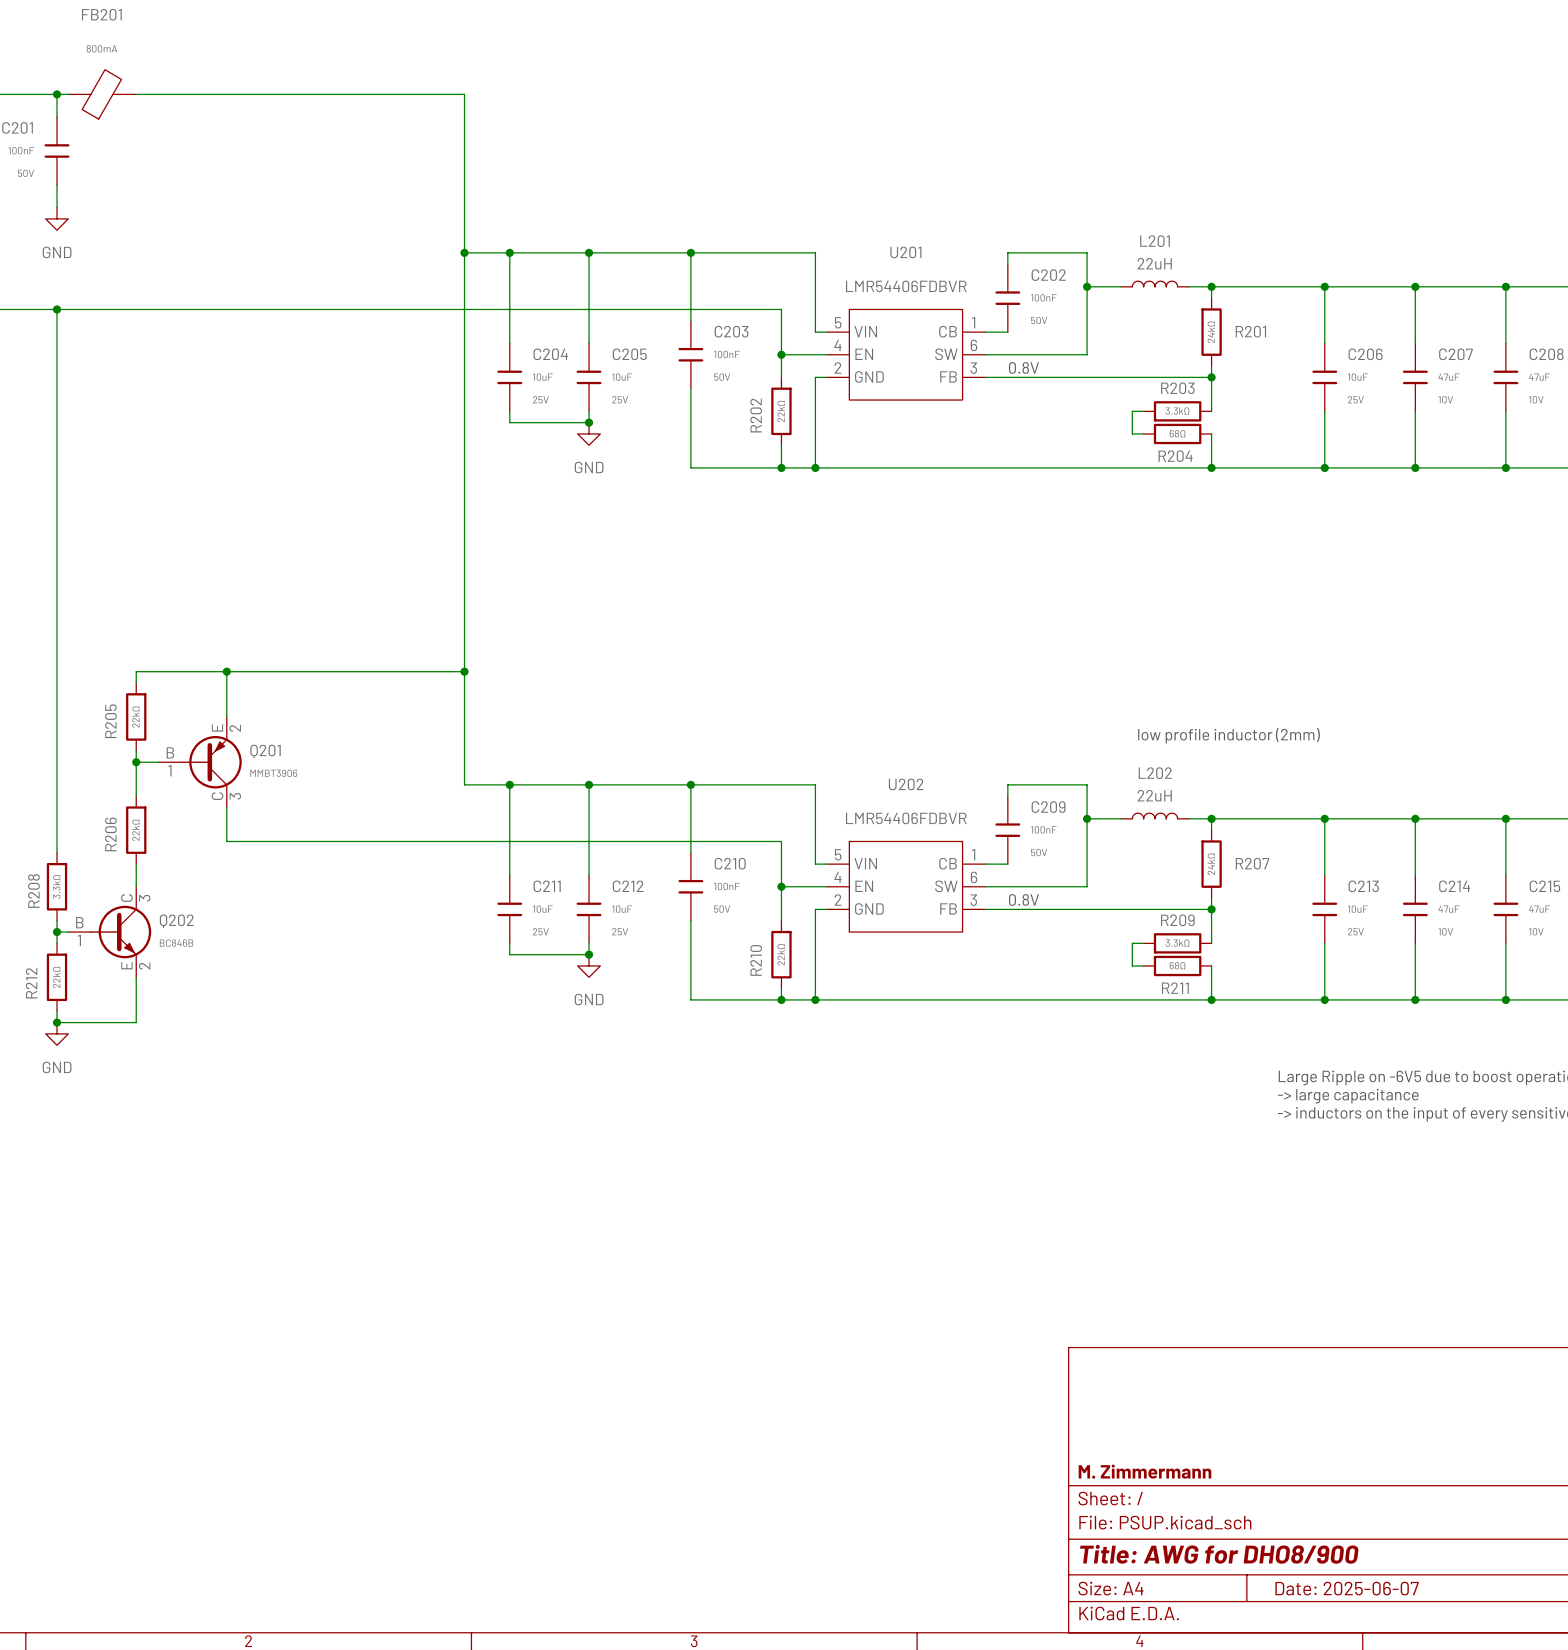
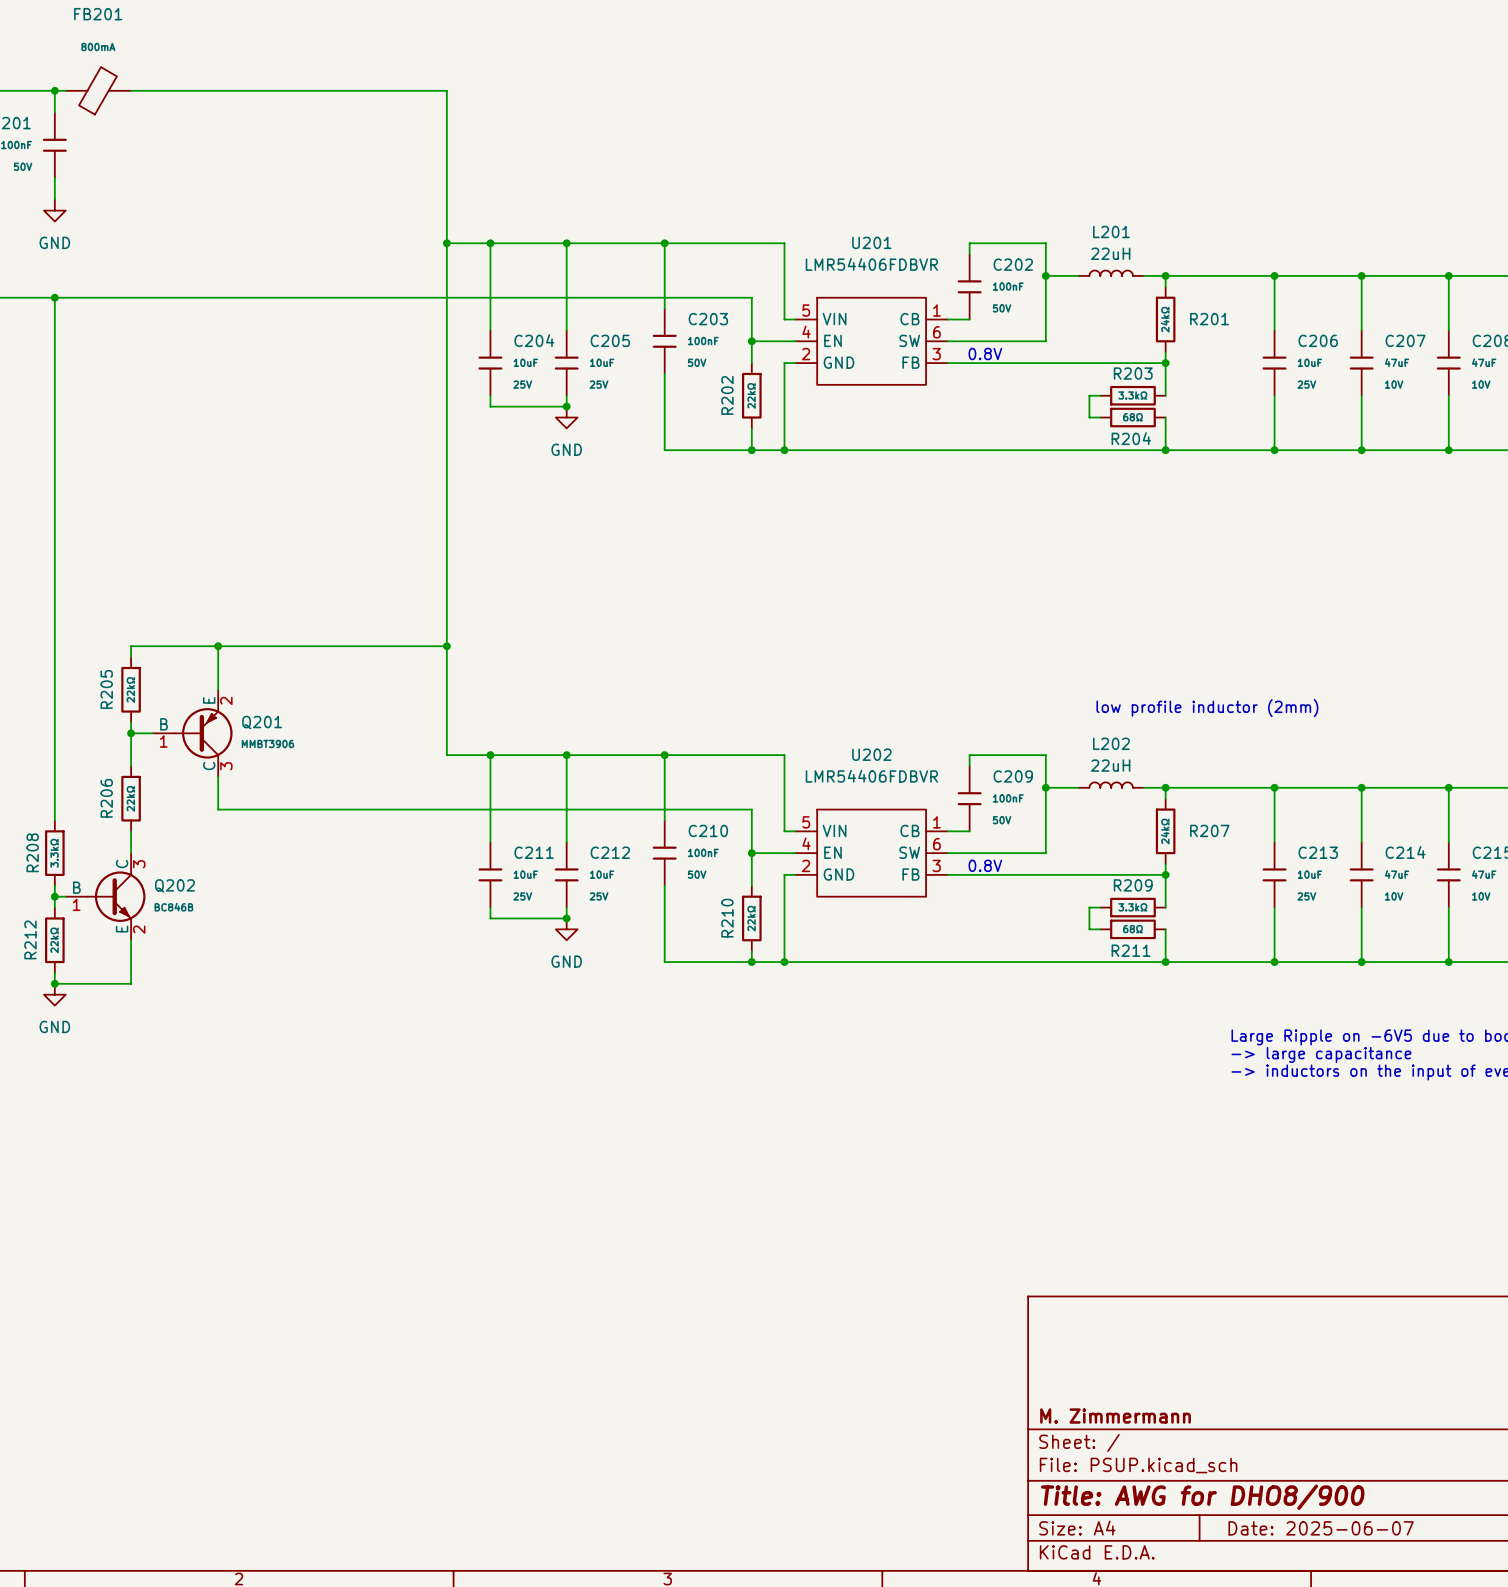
U201 value: none -> LMR54406FDBVR (871, 264)
U201 text: LMR54406FDBVR (906, 286) -> none
U202 value: none -> LMR54406FDBVR (871, 776)
U202 text: LMR54406FDBVR (906, 818) -> none

